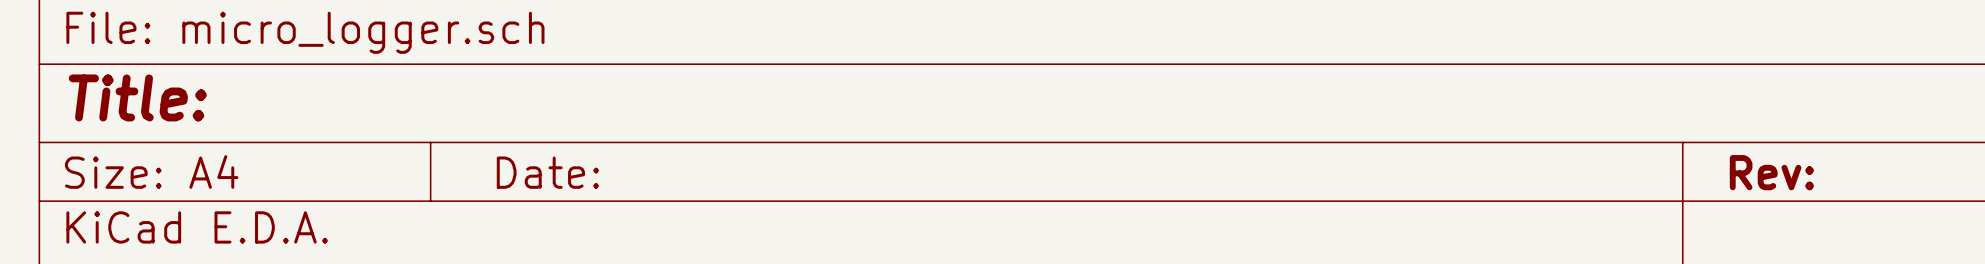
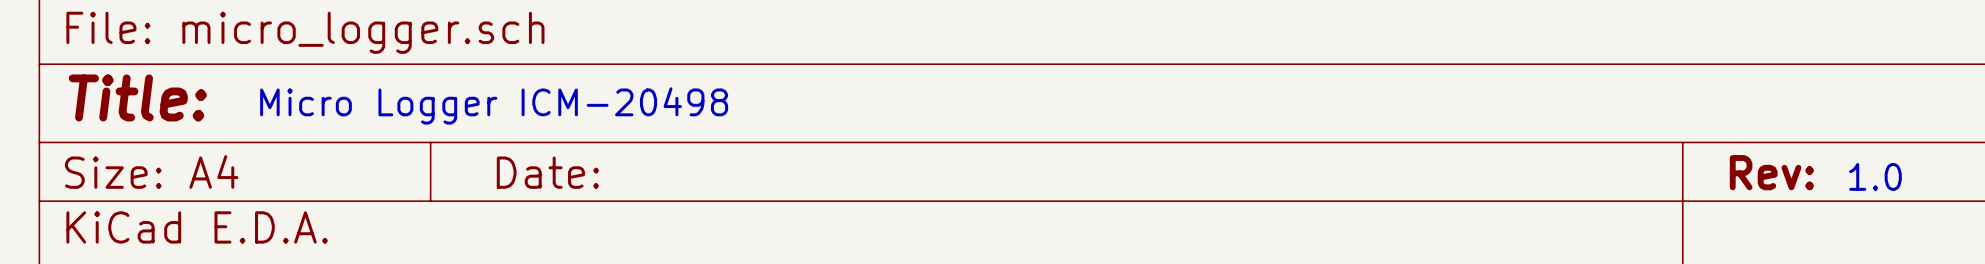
text: none -> Micro Logger ICM-20498 (494, 105)
text: none -> 1.0 (1875, 176)

